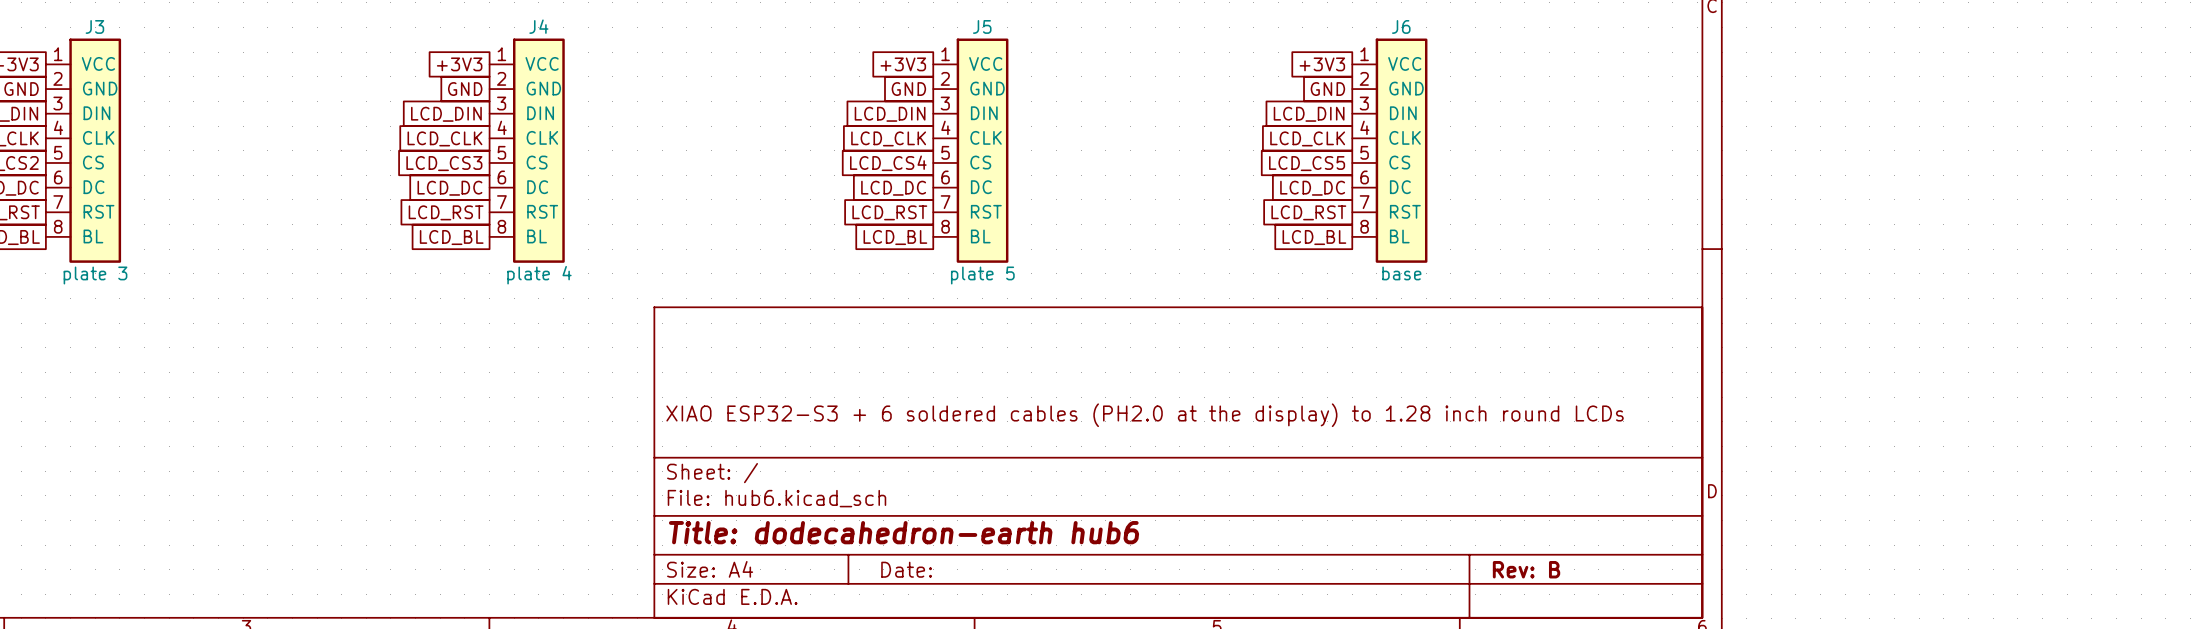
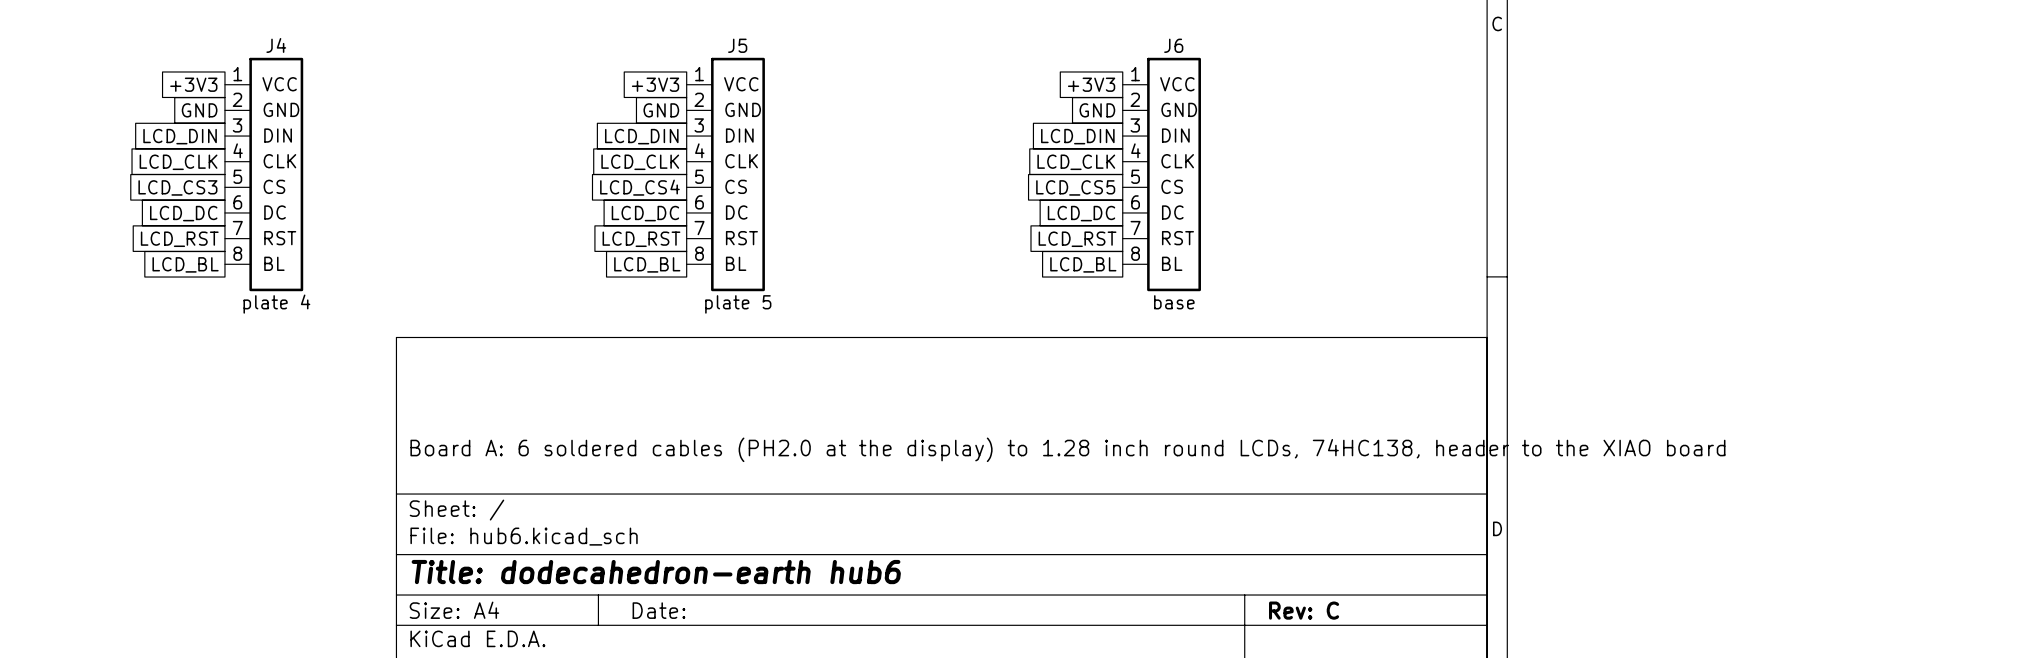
title block: XIAO ESP32-S3 + 6 soldered cables (PH2.0 at the display) to 1.28 inch round LCDs (1145, 415) -> Board A: 6 soldered cables (PH2.0 at the display) to 1.28 inch round LCDs, 74HC138, header to the XIAO board (1067, 449)
title block: Rev: B (1526, 569) -> Rev: C (1304, 610)

